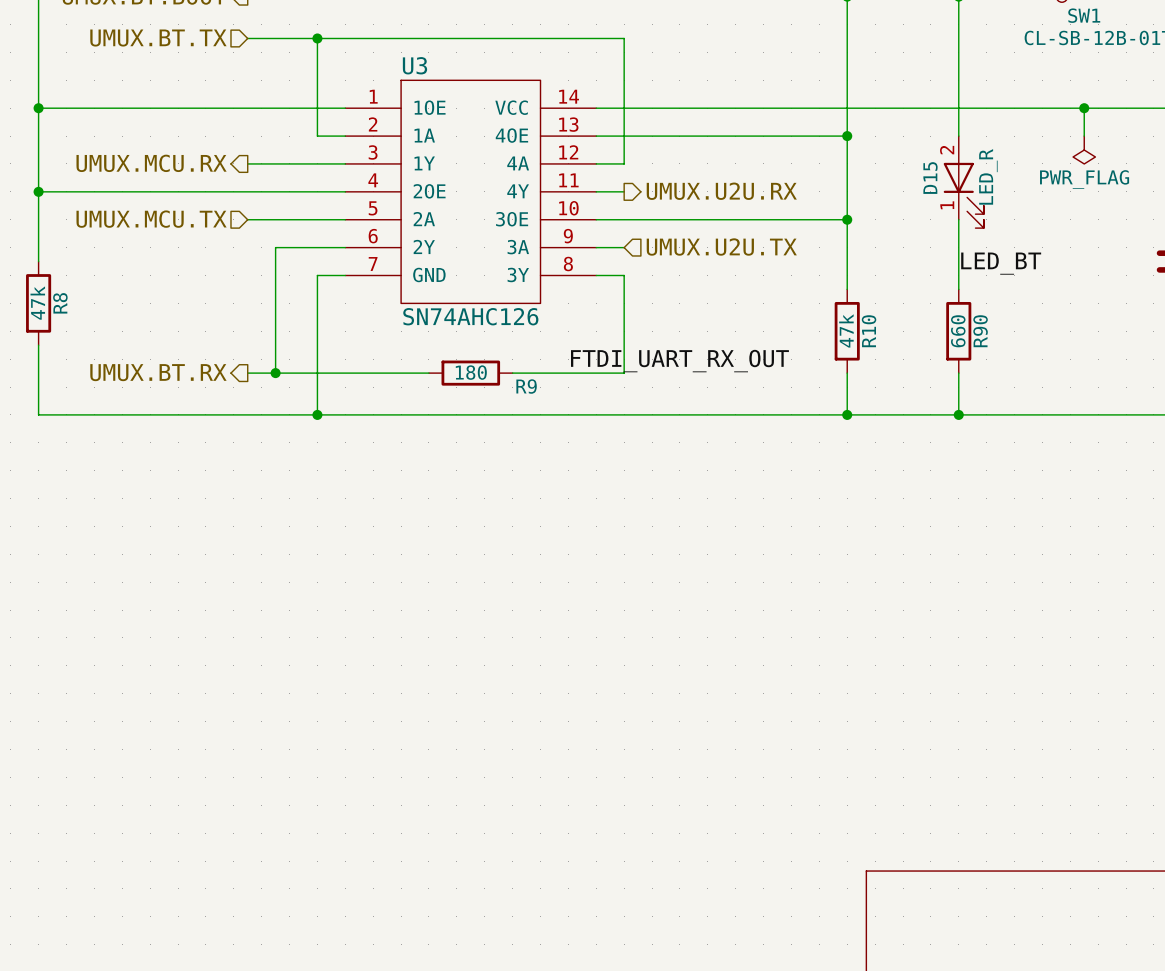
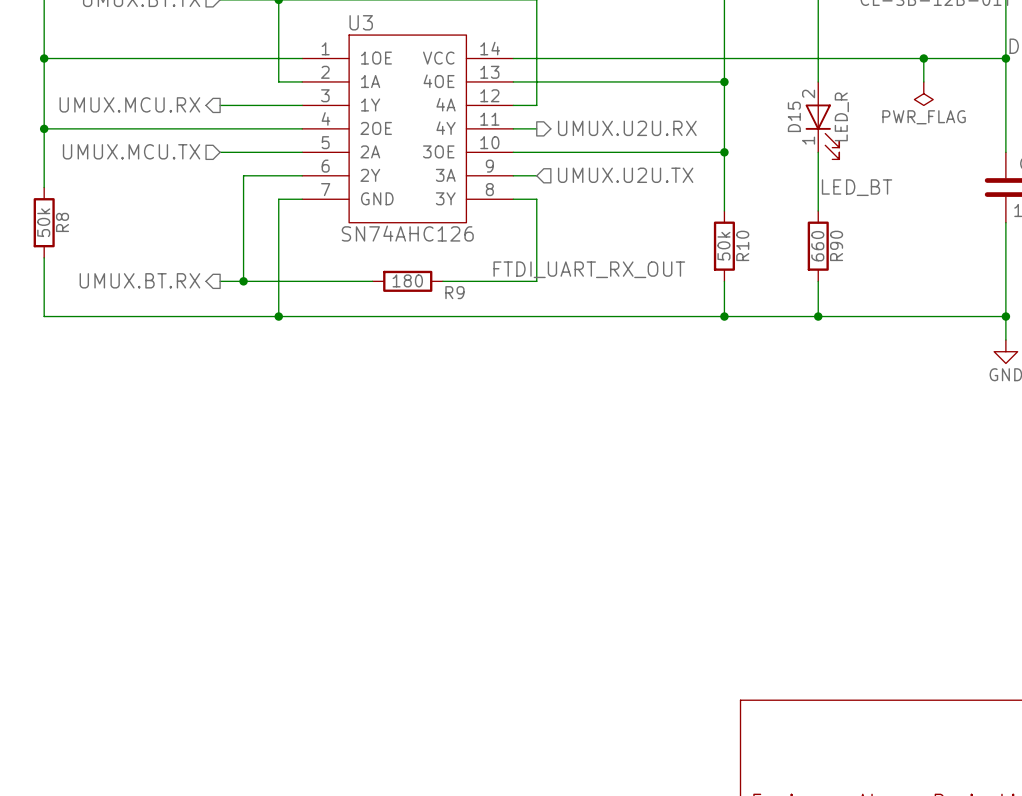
R8 value: 47k (37, 303) -> 50k (43, 222)
R10 value: 47k (846, 330) -> 50k (723, 246)

